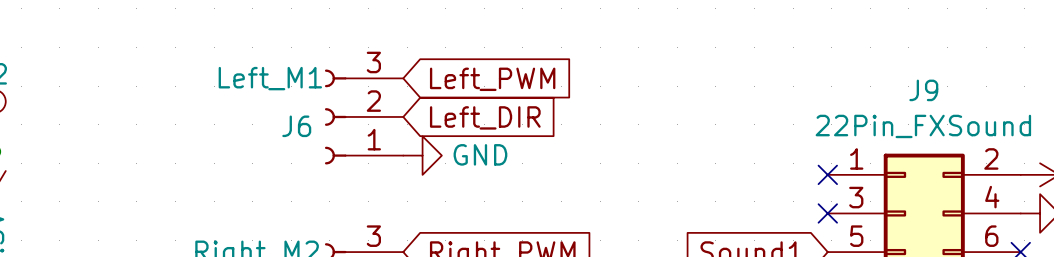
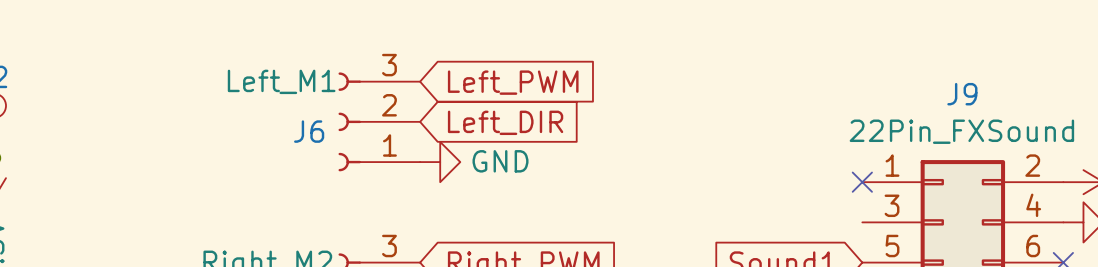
no-connect mark: (827, 213) -> none

